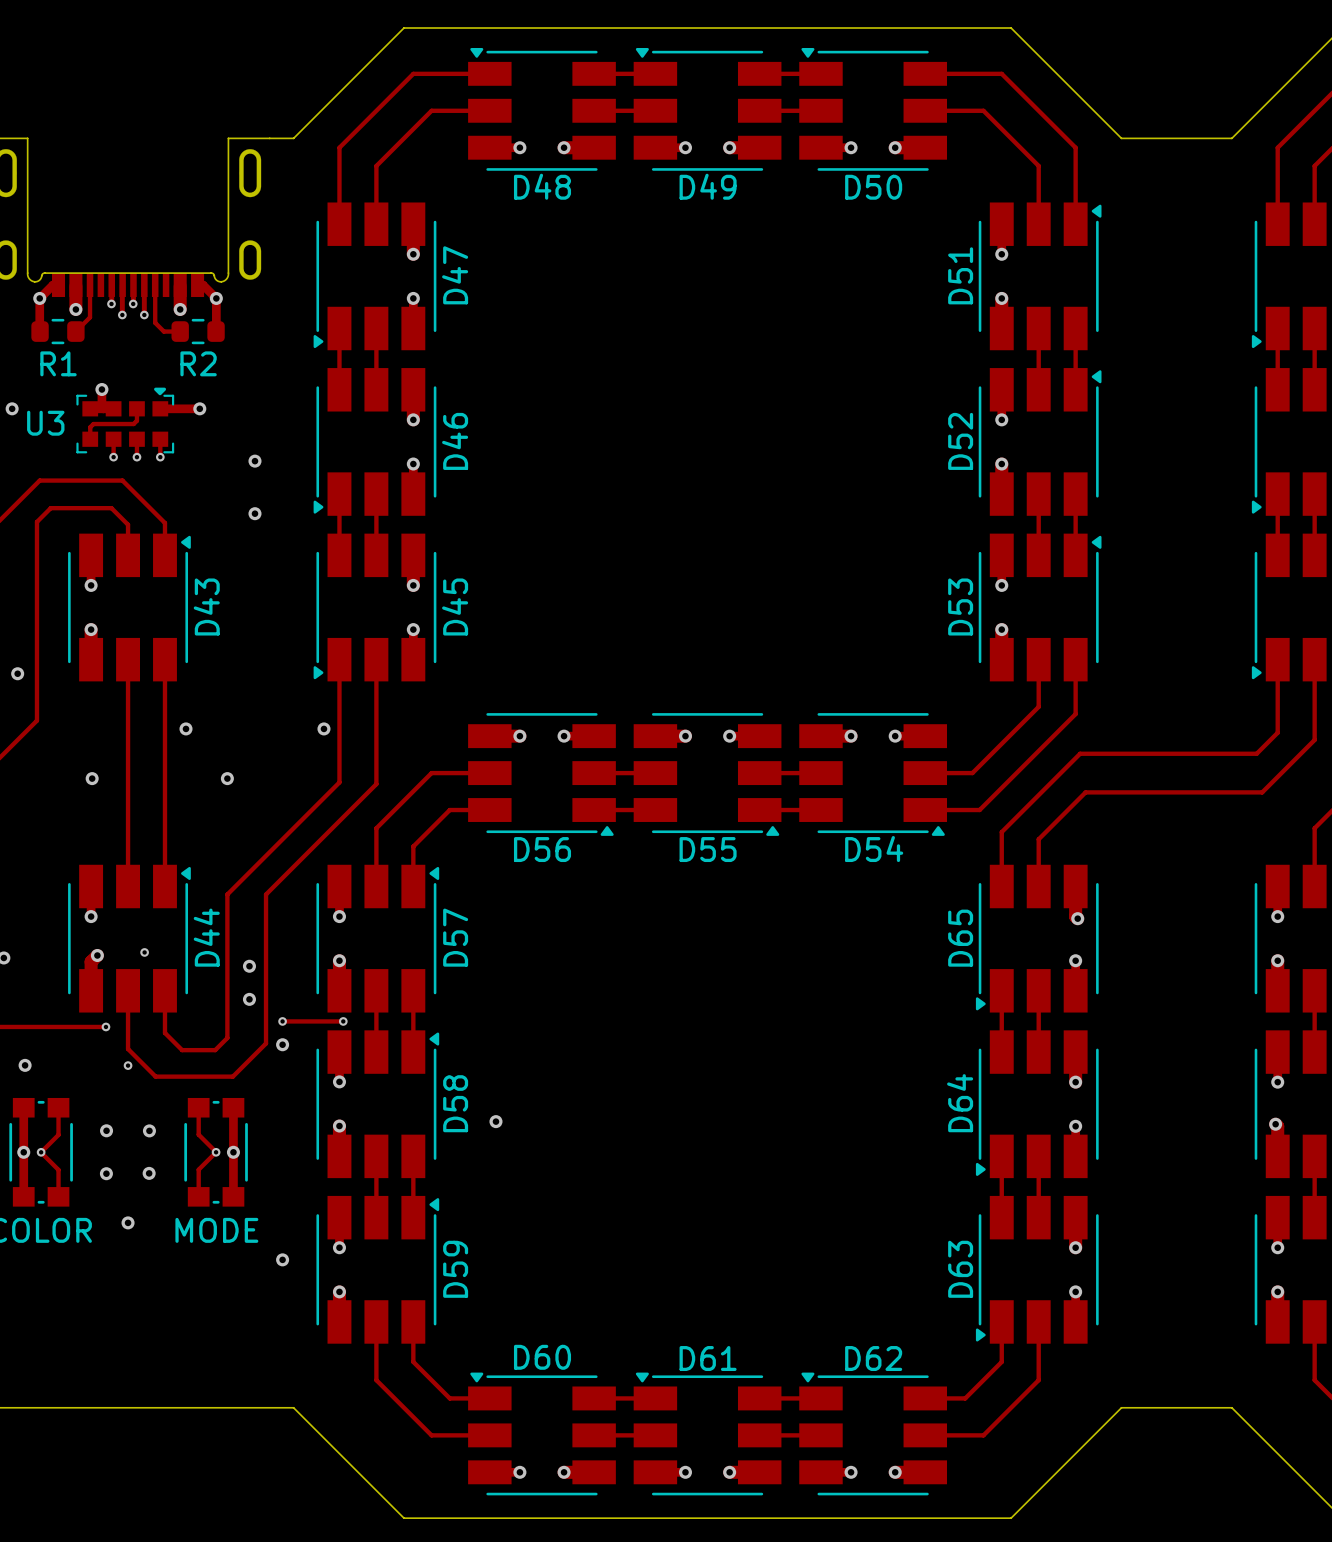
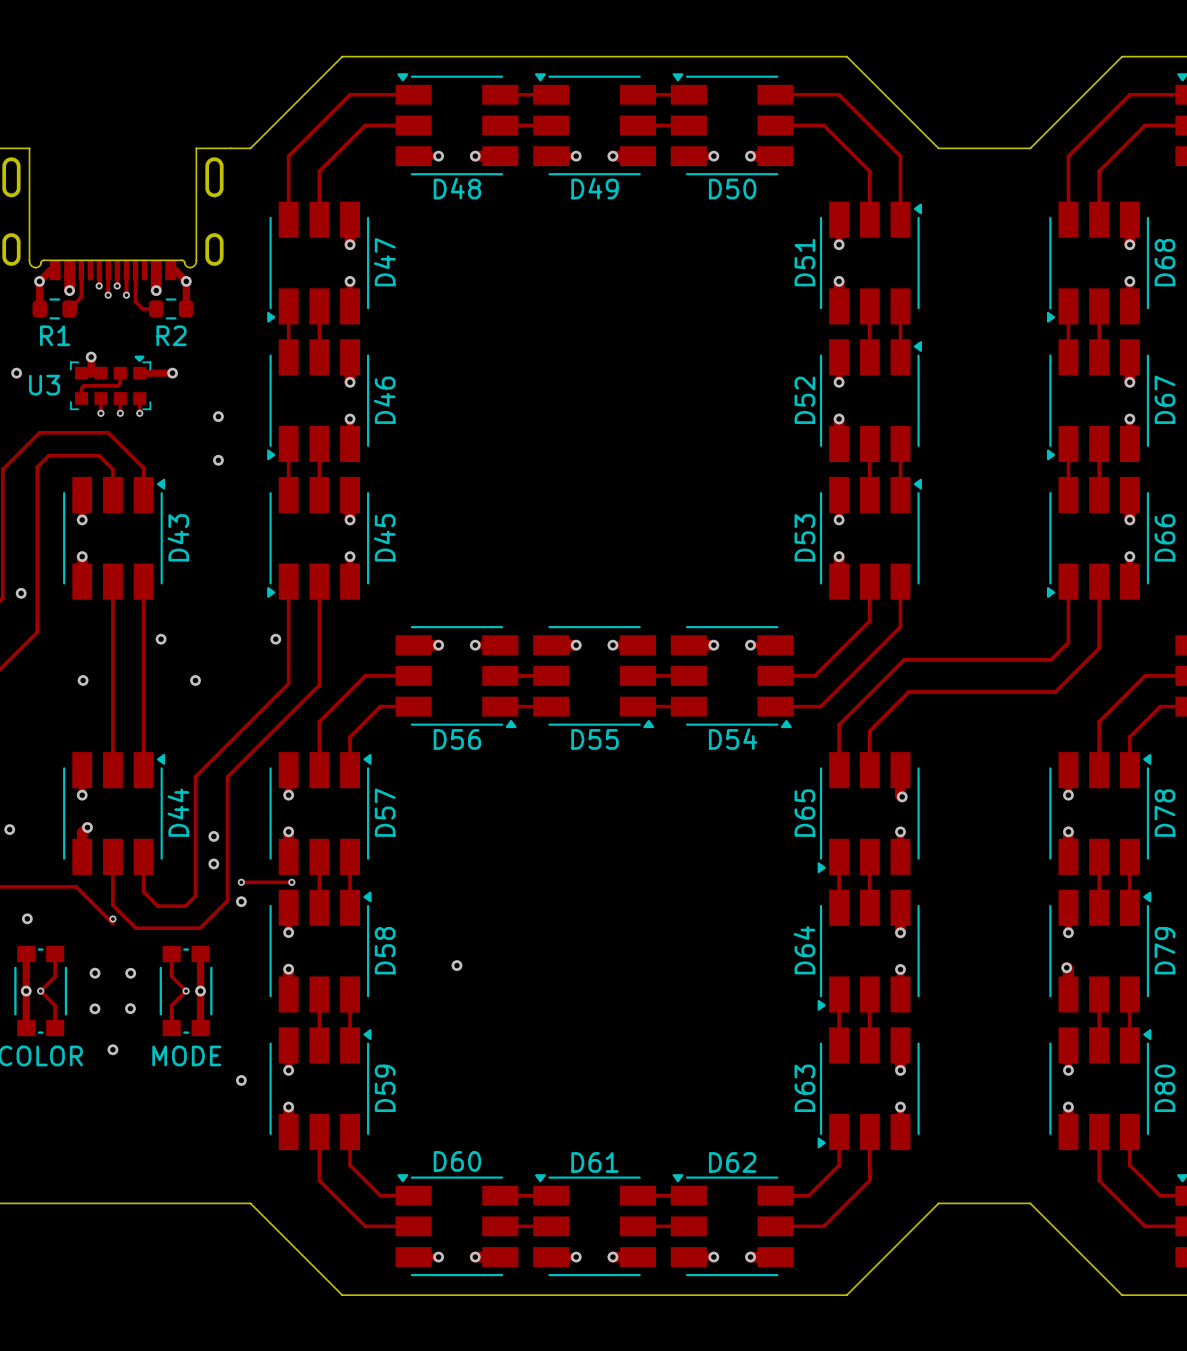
via: (144, 952) -> none
track: (83, 1026) (105, 1026) -> (76, 886) (112, 923)
via: (105, 1026) -> none
via position: (495, 1121) -> (456, 965)

